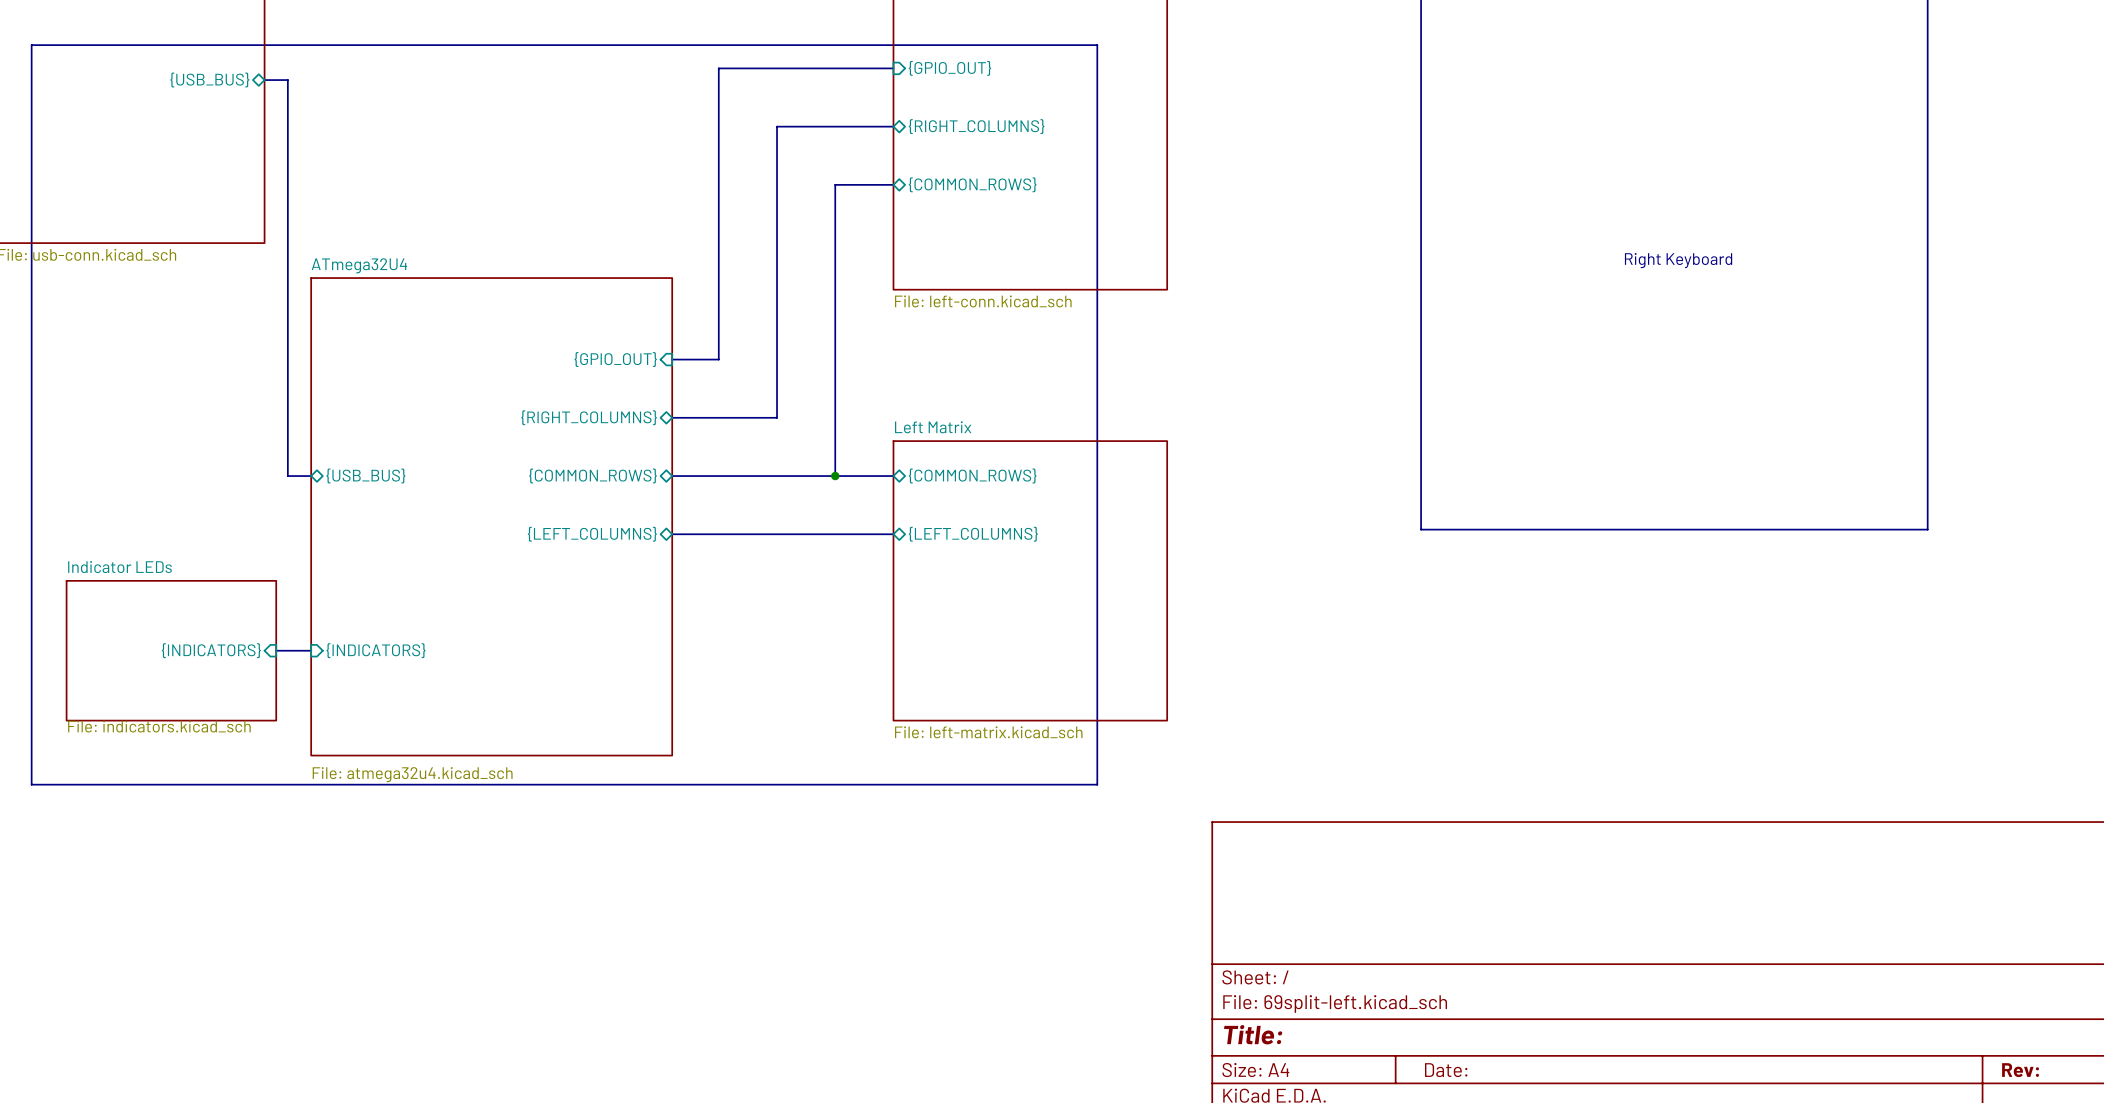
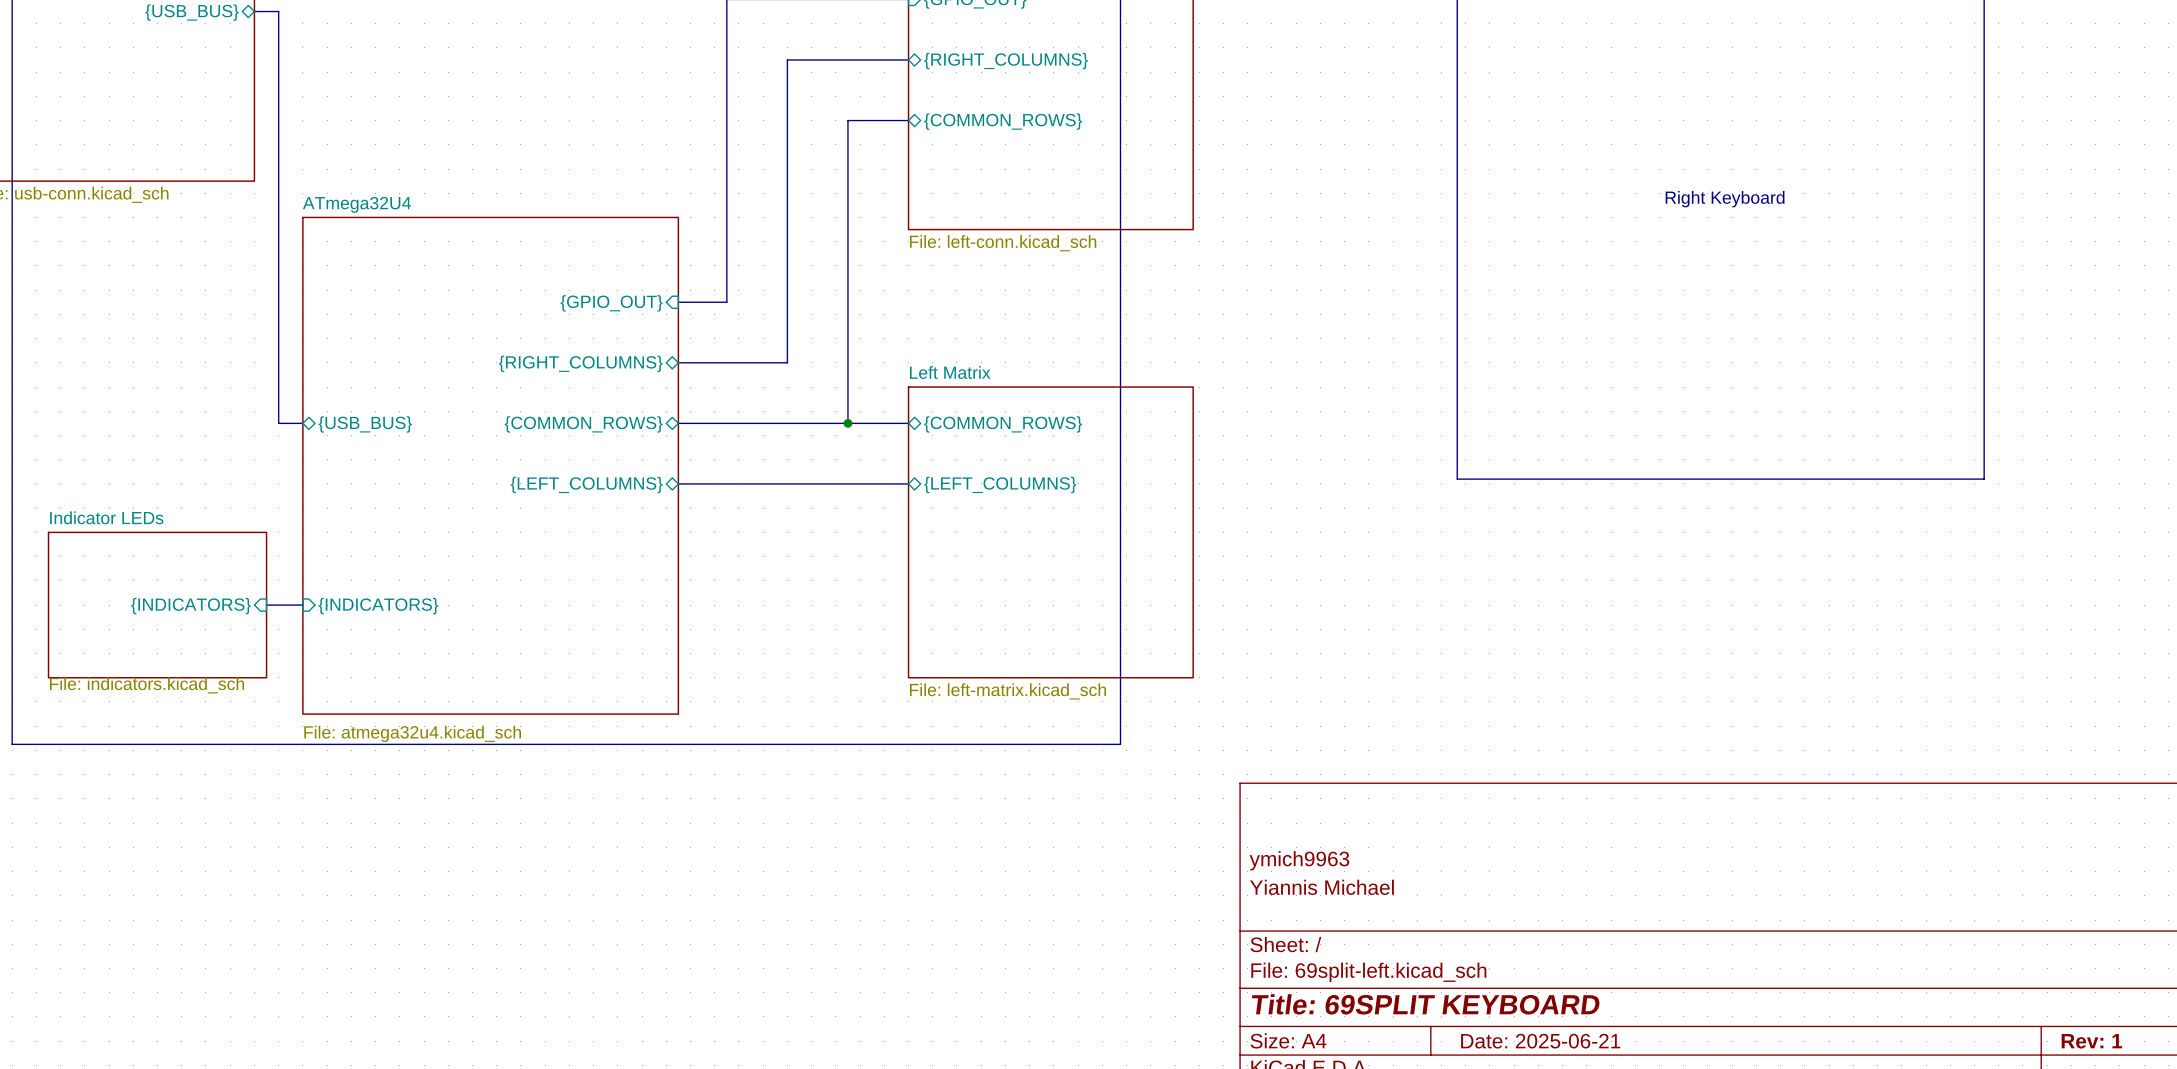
title block: none -> ymich9963 (1299, 860)
title block: none -> Yiannis Michael (1321, 887)
title block: Title: (1253, 1034) -> Title: 69SPLIT KEYBOARD (1425, 1004)
title block: Date: (1446, 1070) -> Date: 2025-06-21 (1540, 1041)
title block: Rev: (2020, 1070) -> Rev: 1 (2091, 1041)

